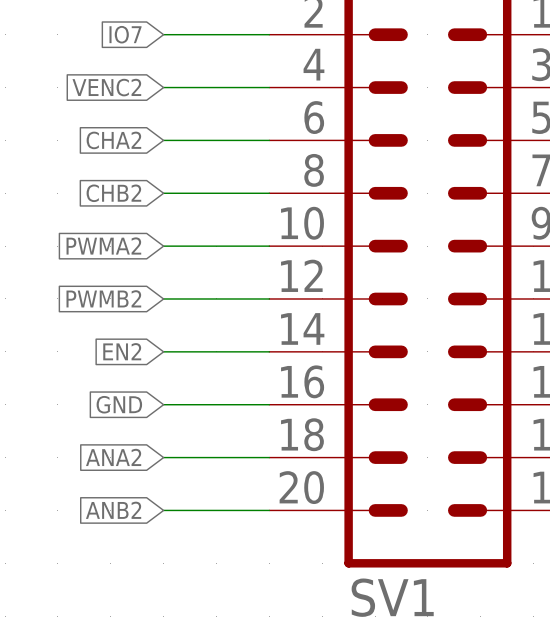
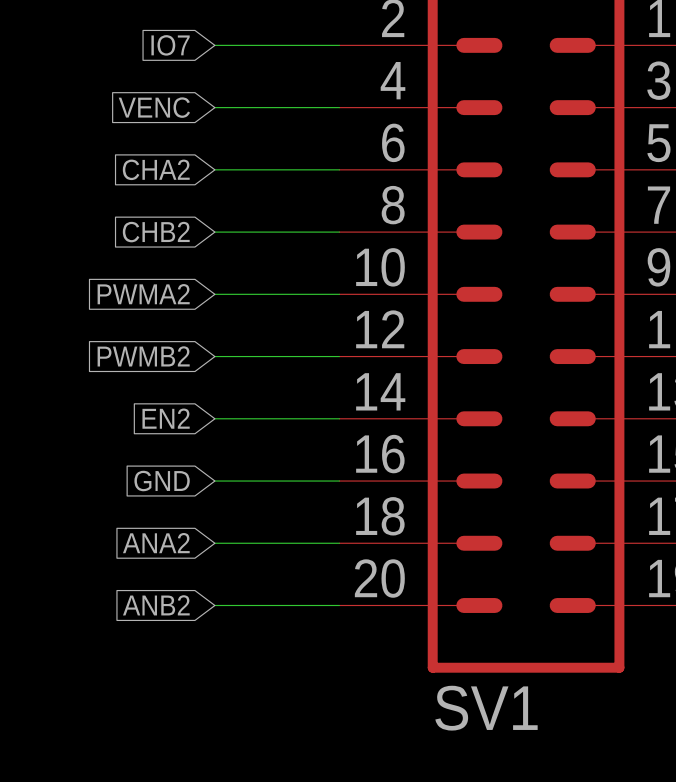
global label: VENC2 (106, 87) -> VENC (154, 107)

